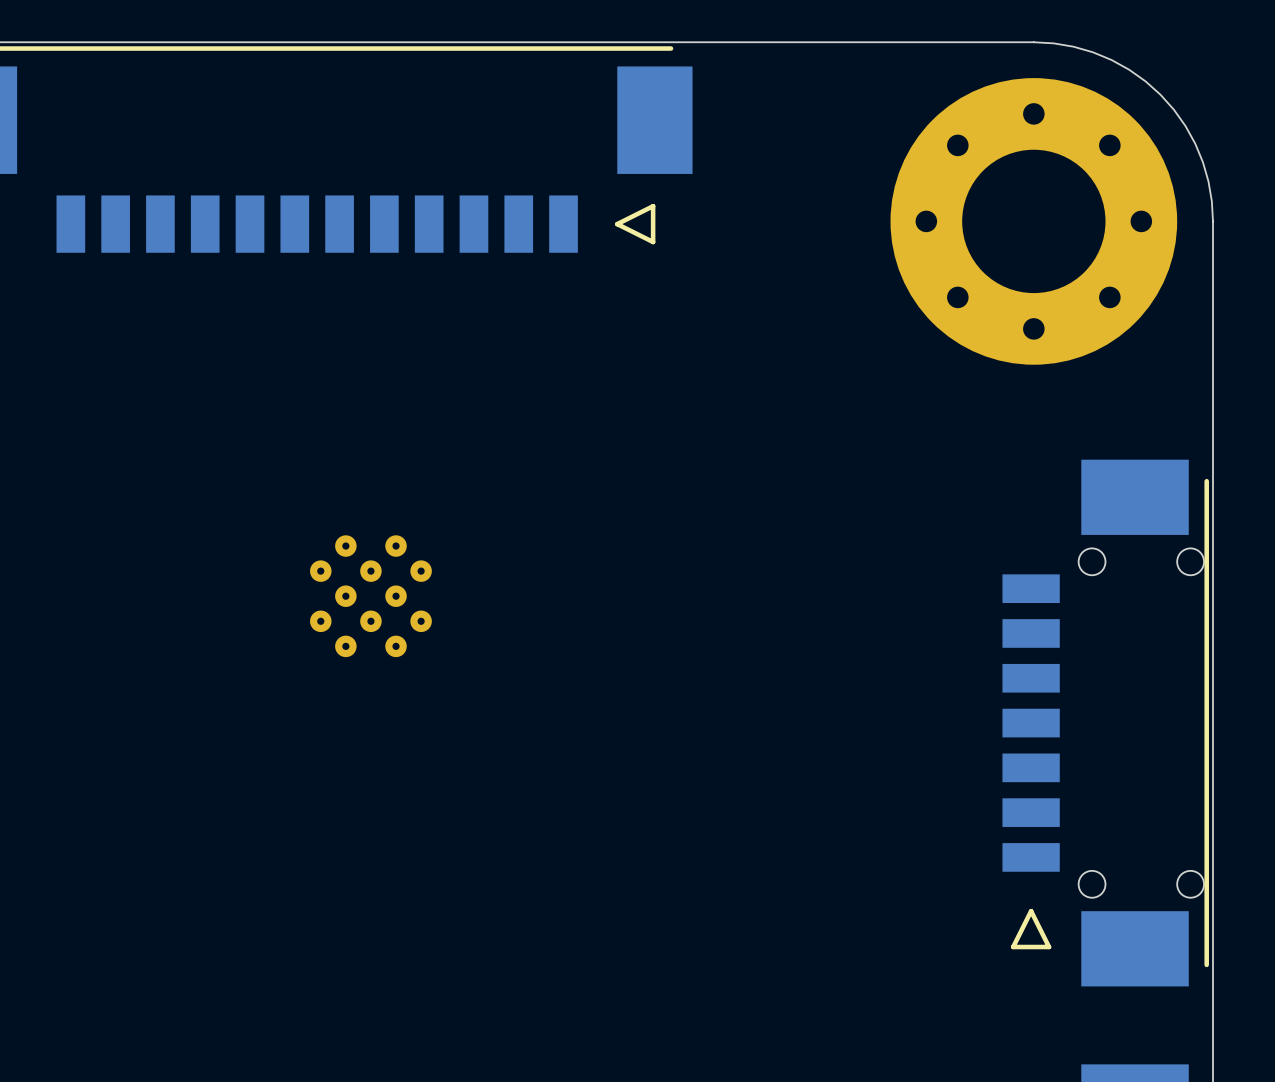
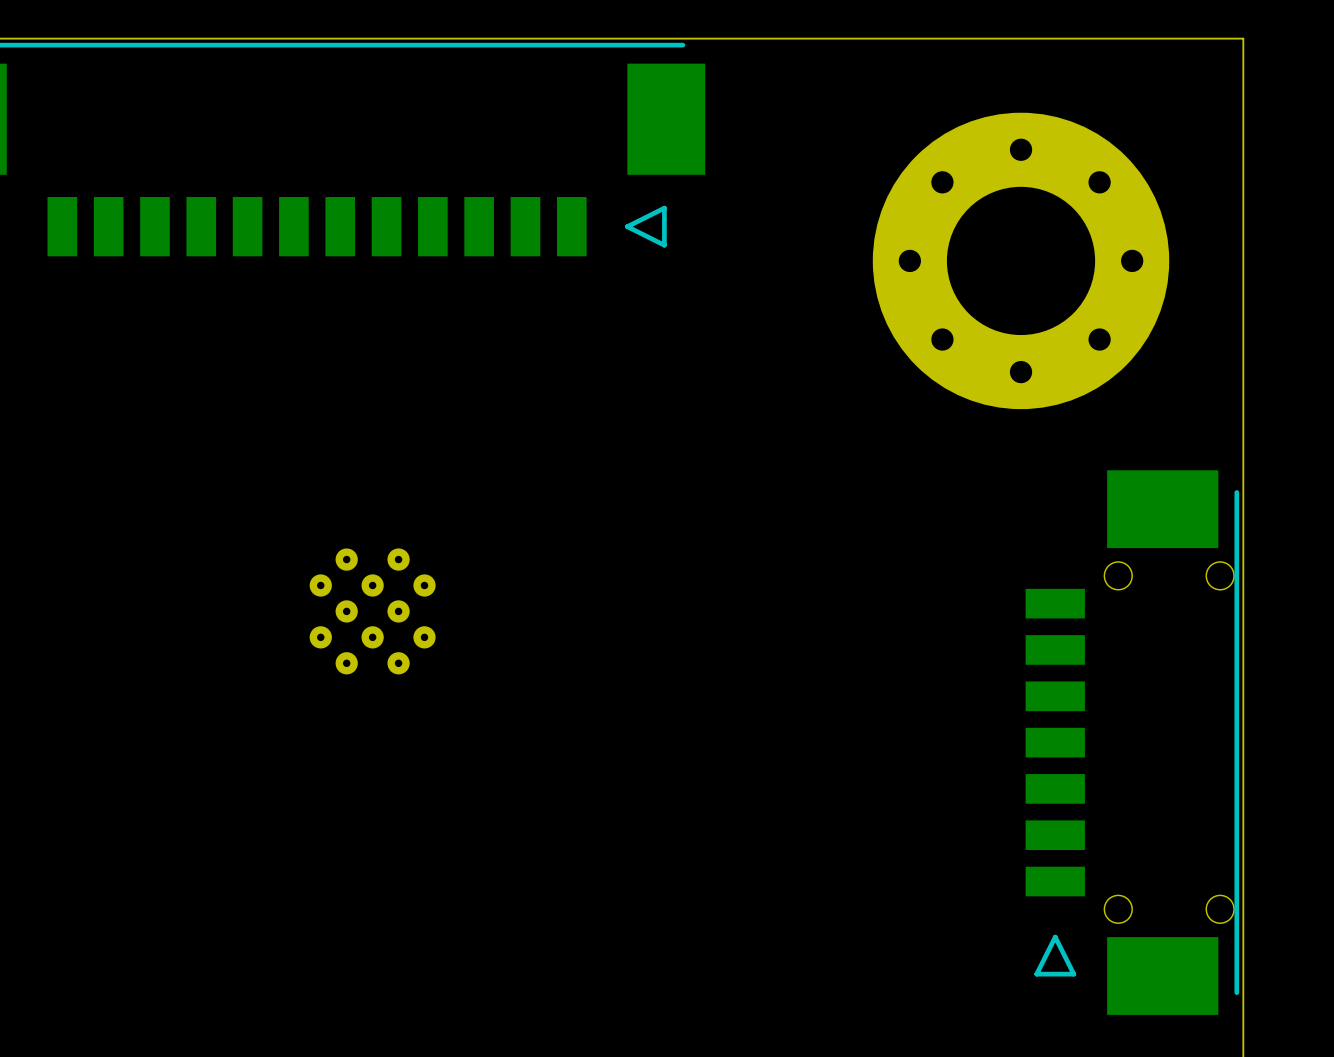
board edge: (1033, 42) (1053, 43) (1093, 52) (1129, 69) (1160, 94) (1173, 109) (1195, 143) (1208, 181) (1212, 221) -> (1058, 38) (1243, 38) (1243, 223)
part position: (1033, 221) -> (1021, 260)

